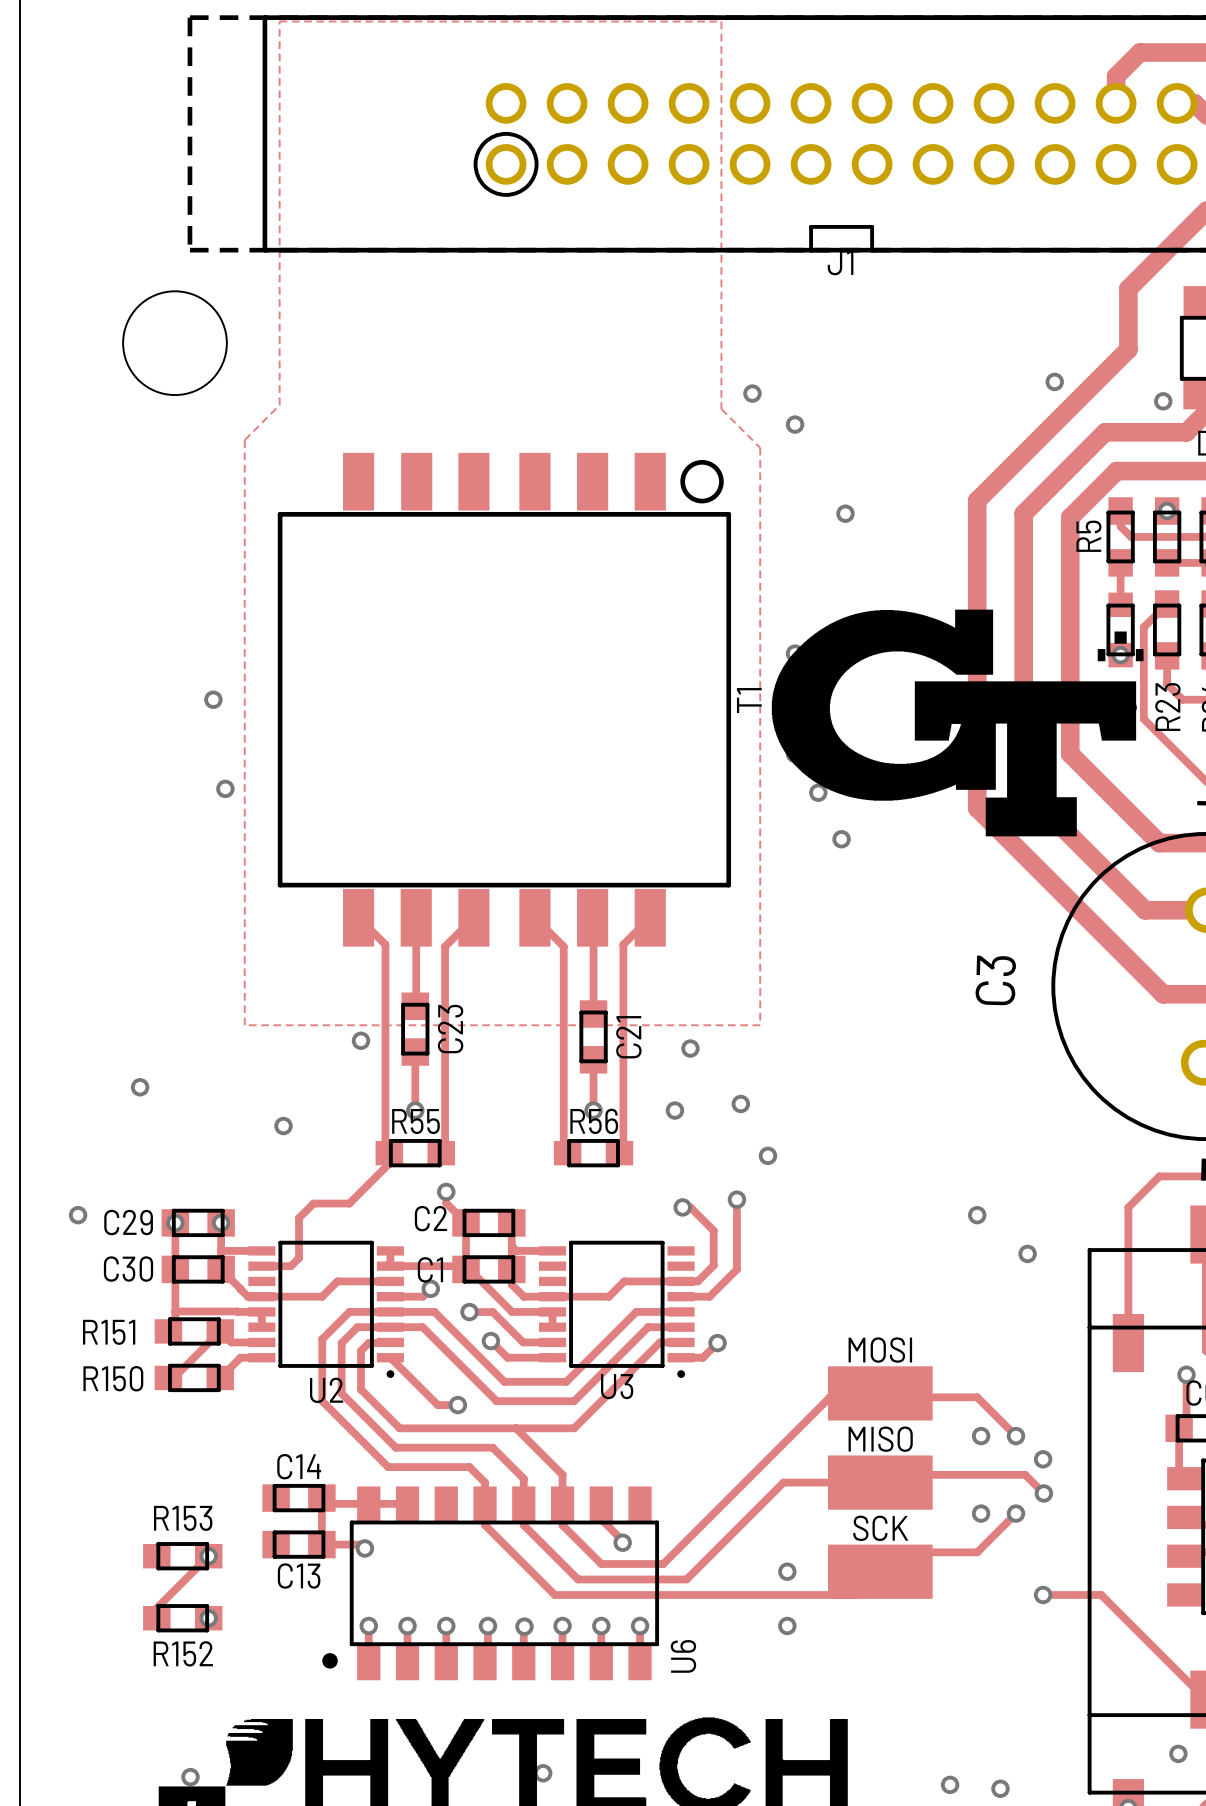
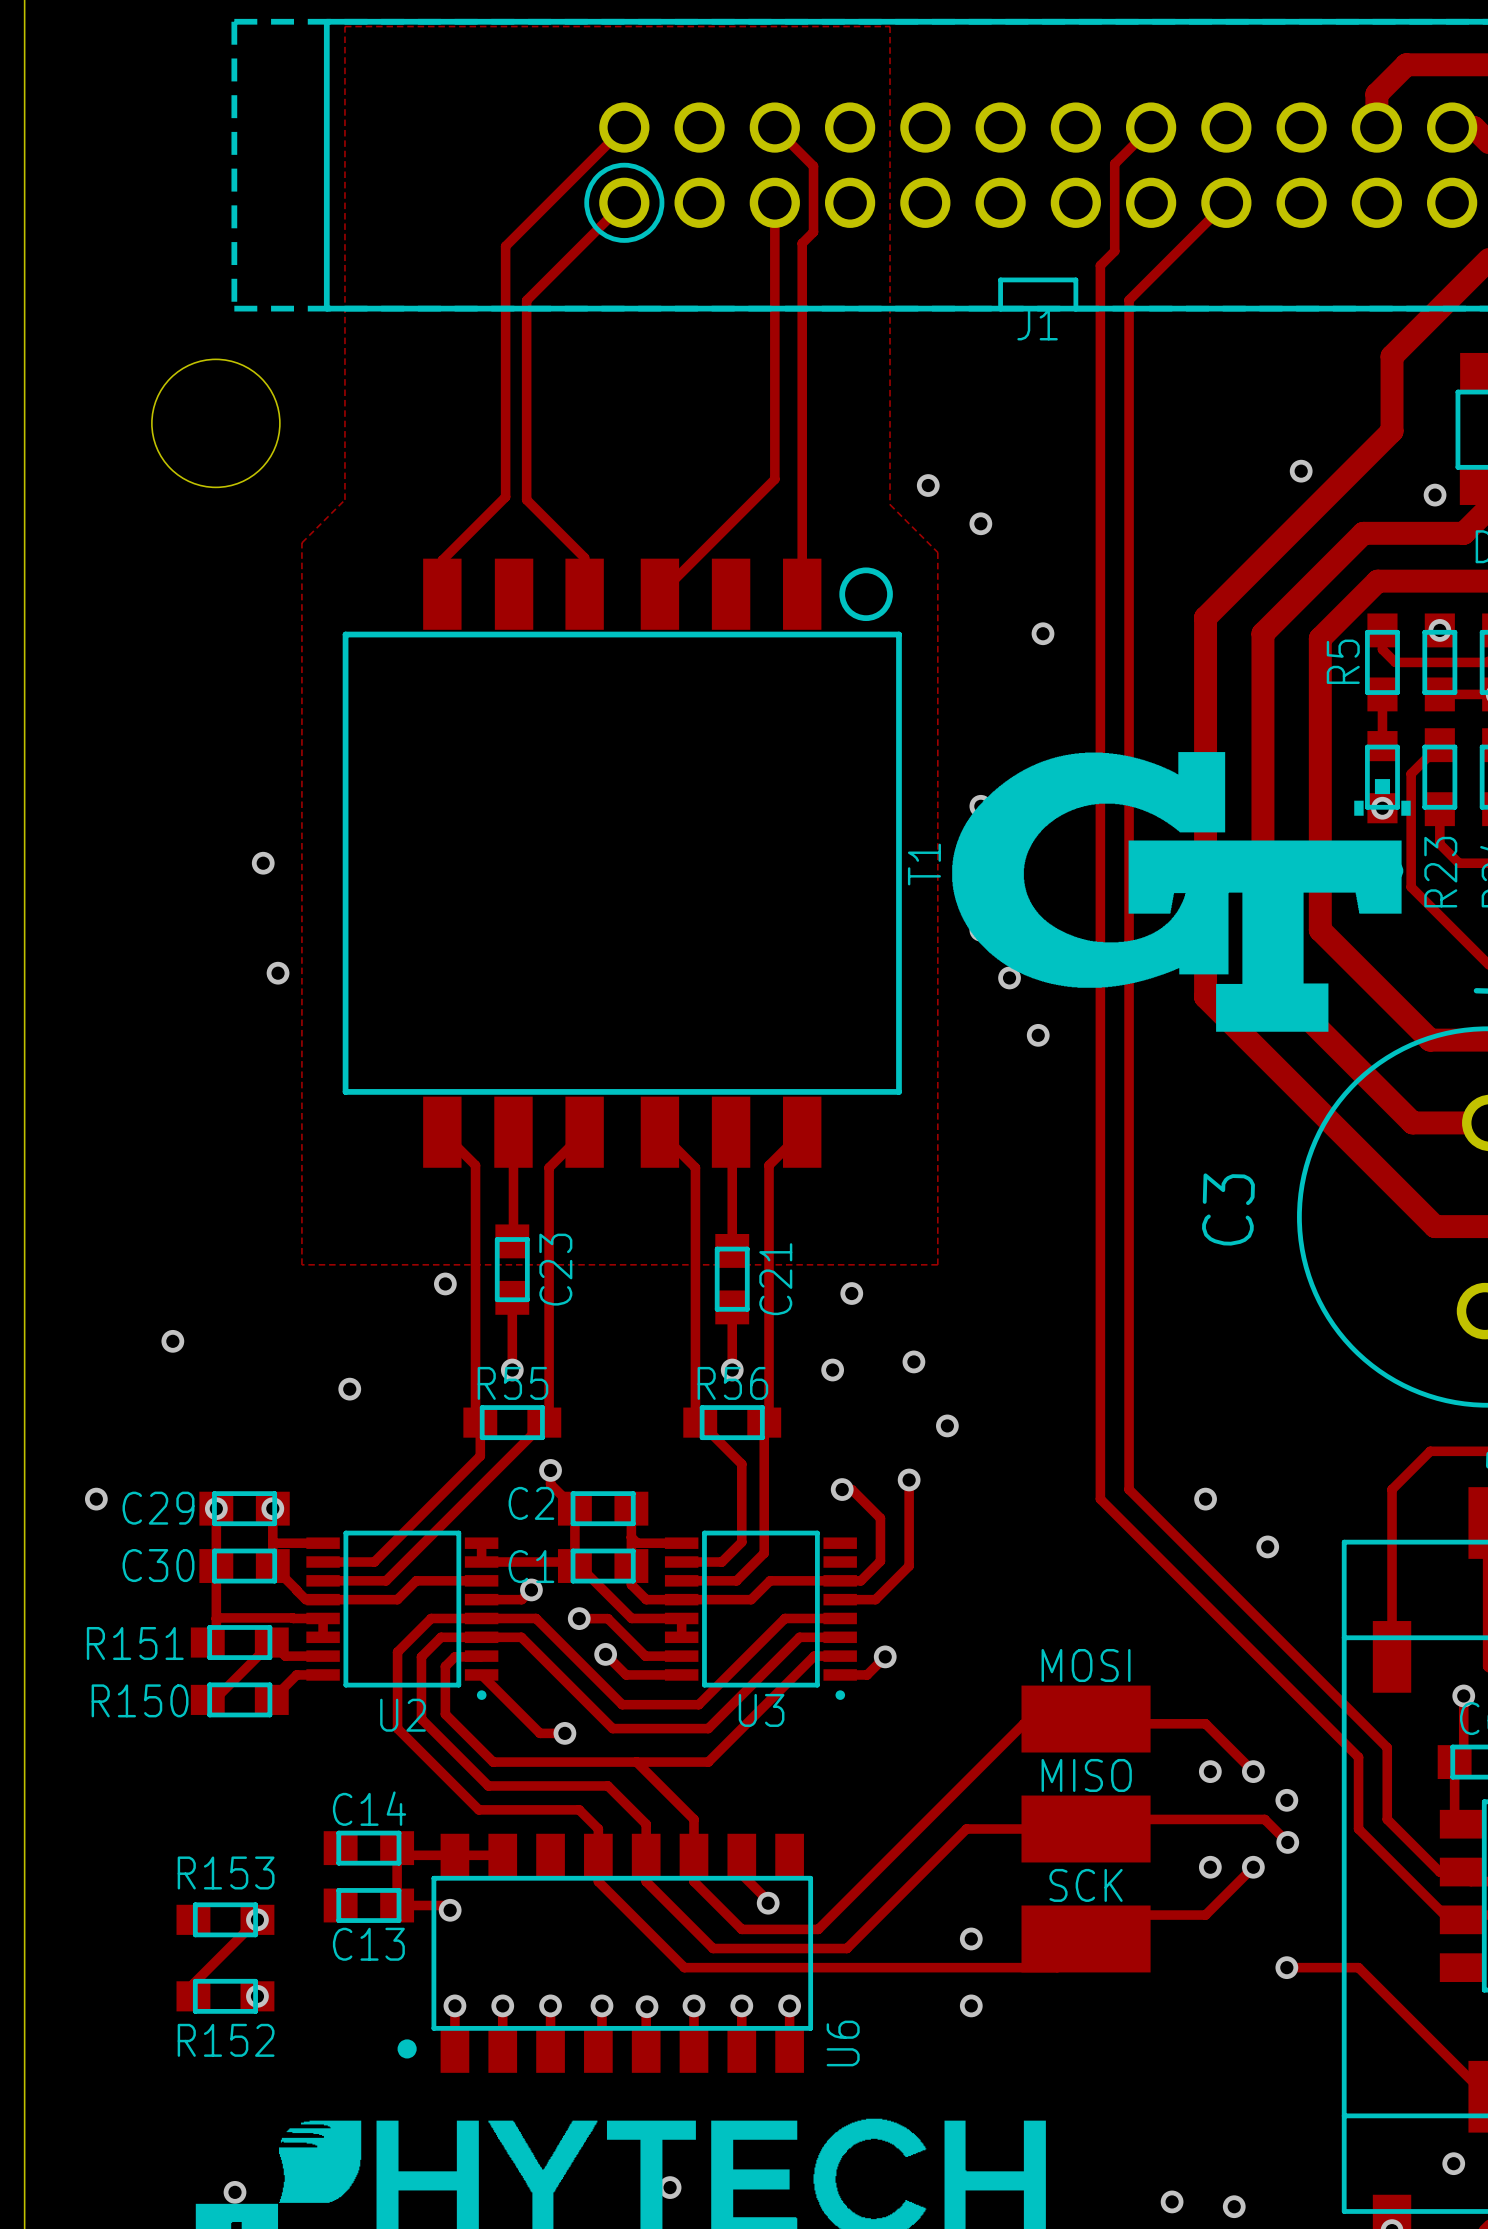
track: none -> (624, 127) (505, 246) (505, 496) (442, 560) (442, 594)
track: none -> (774, 127) (813, 166) (813, 232) (802, 243) (802, 594)
track: none -> (1151, 127) (1114, 163) (1114, 251) (1100, 265) (1100, 1499) (1358, 1757) (1358, 1829) (1449, 1919) (1461, 1919)
track: none -> (624, 202) (526, 300) (526, 499) (584, 557) (584, 594)
track: none -> (774, 202) (774, 479) (659, 594)
track: none -> (1226, 202) (1129, 300) (1129, 1489) (1387, 1747) (1387, 1819) (1439, 1872) (1461, 1872)
track: none -> (544, 1422) (386, 1580) (323, 1580)
track: none -> (700, 1422) (741, 1464) (741, 1542) (721, 1562) (681, 1562)
track: none -> (764, 1422) (764, 1553) (736, 1580) (681, 1580)
track: (389, 1163) (349, 1203) (313, 1203) (299, 1218) (299, 1258) (290, 1266) -> (480, 1435) (480, 1456) (374, 1562) (358, 1562)

